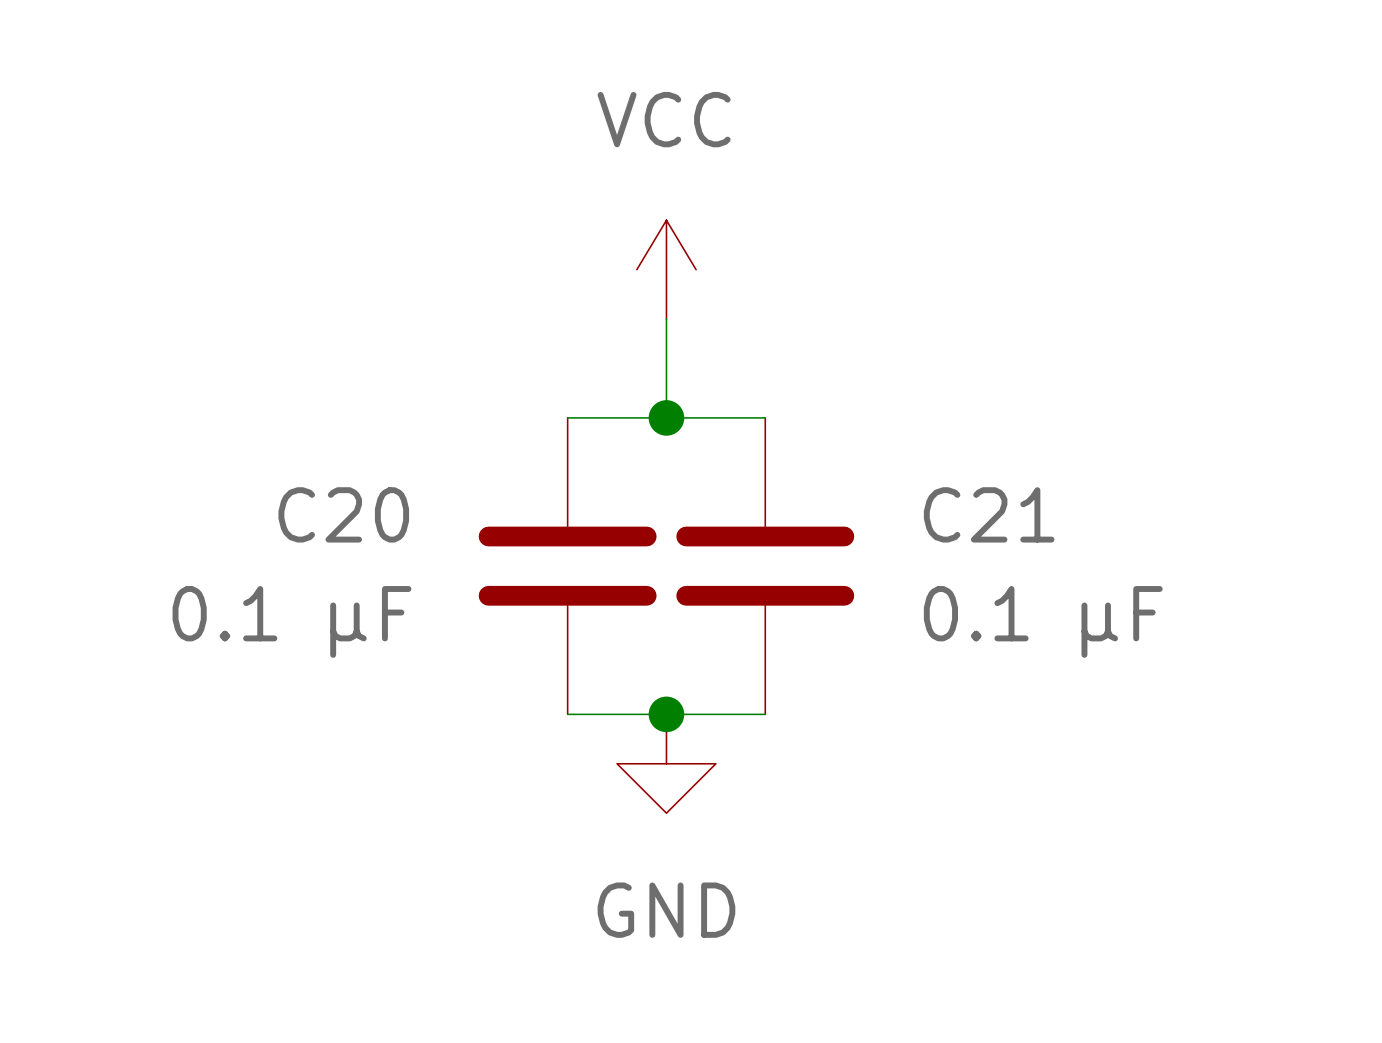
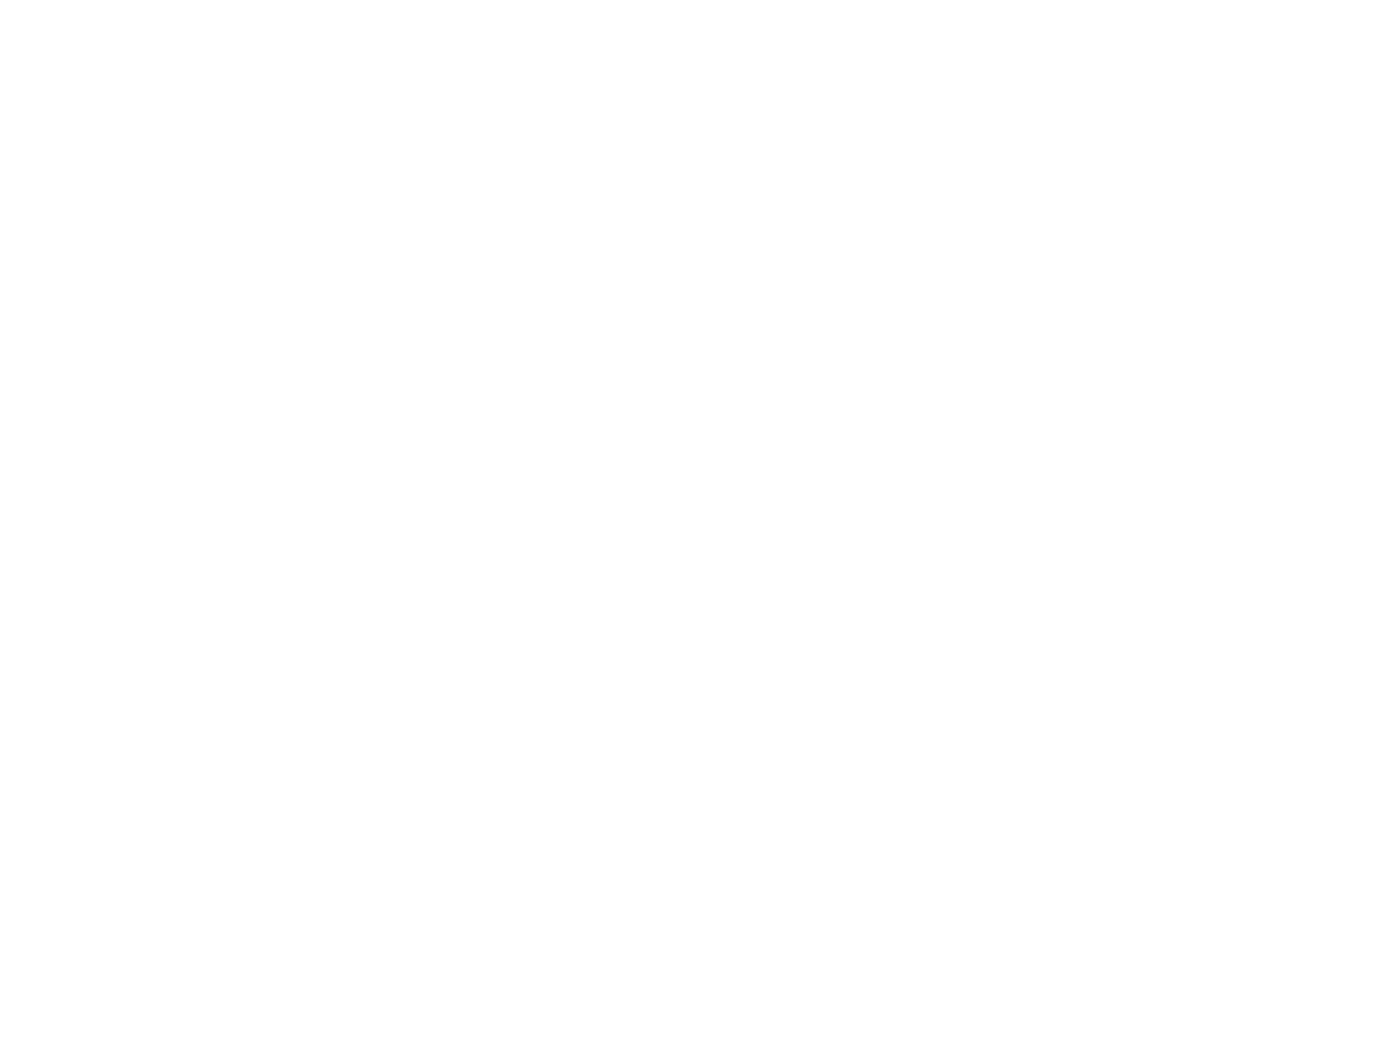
power symbol: VCC (666, 269) -> none
wire: (666, 319) (666, 417) -> none
wire: (567, 417) (765, 417) -> none
junction: (666, 417) -> none
C20: 0.1 µF (567, 566) -> none
C21: 0.1 µF (765, 566) -> none
wire: (567, 714) (765, 714) -> none
junction: (666, 714) -> none
power symbol: GND (666, 763) -> none

